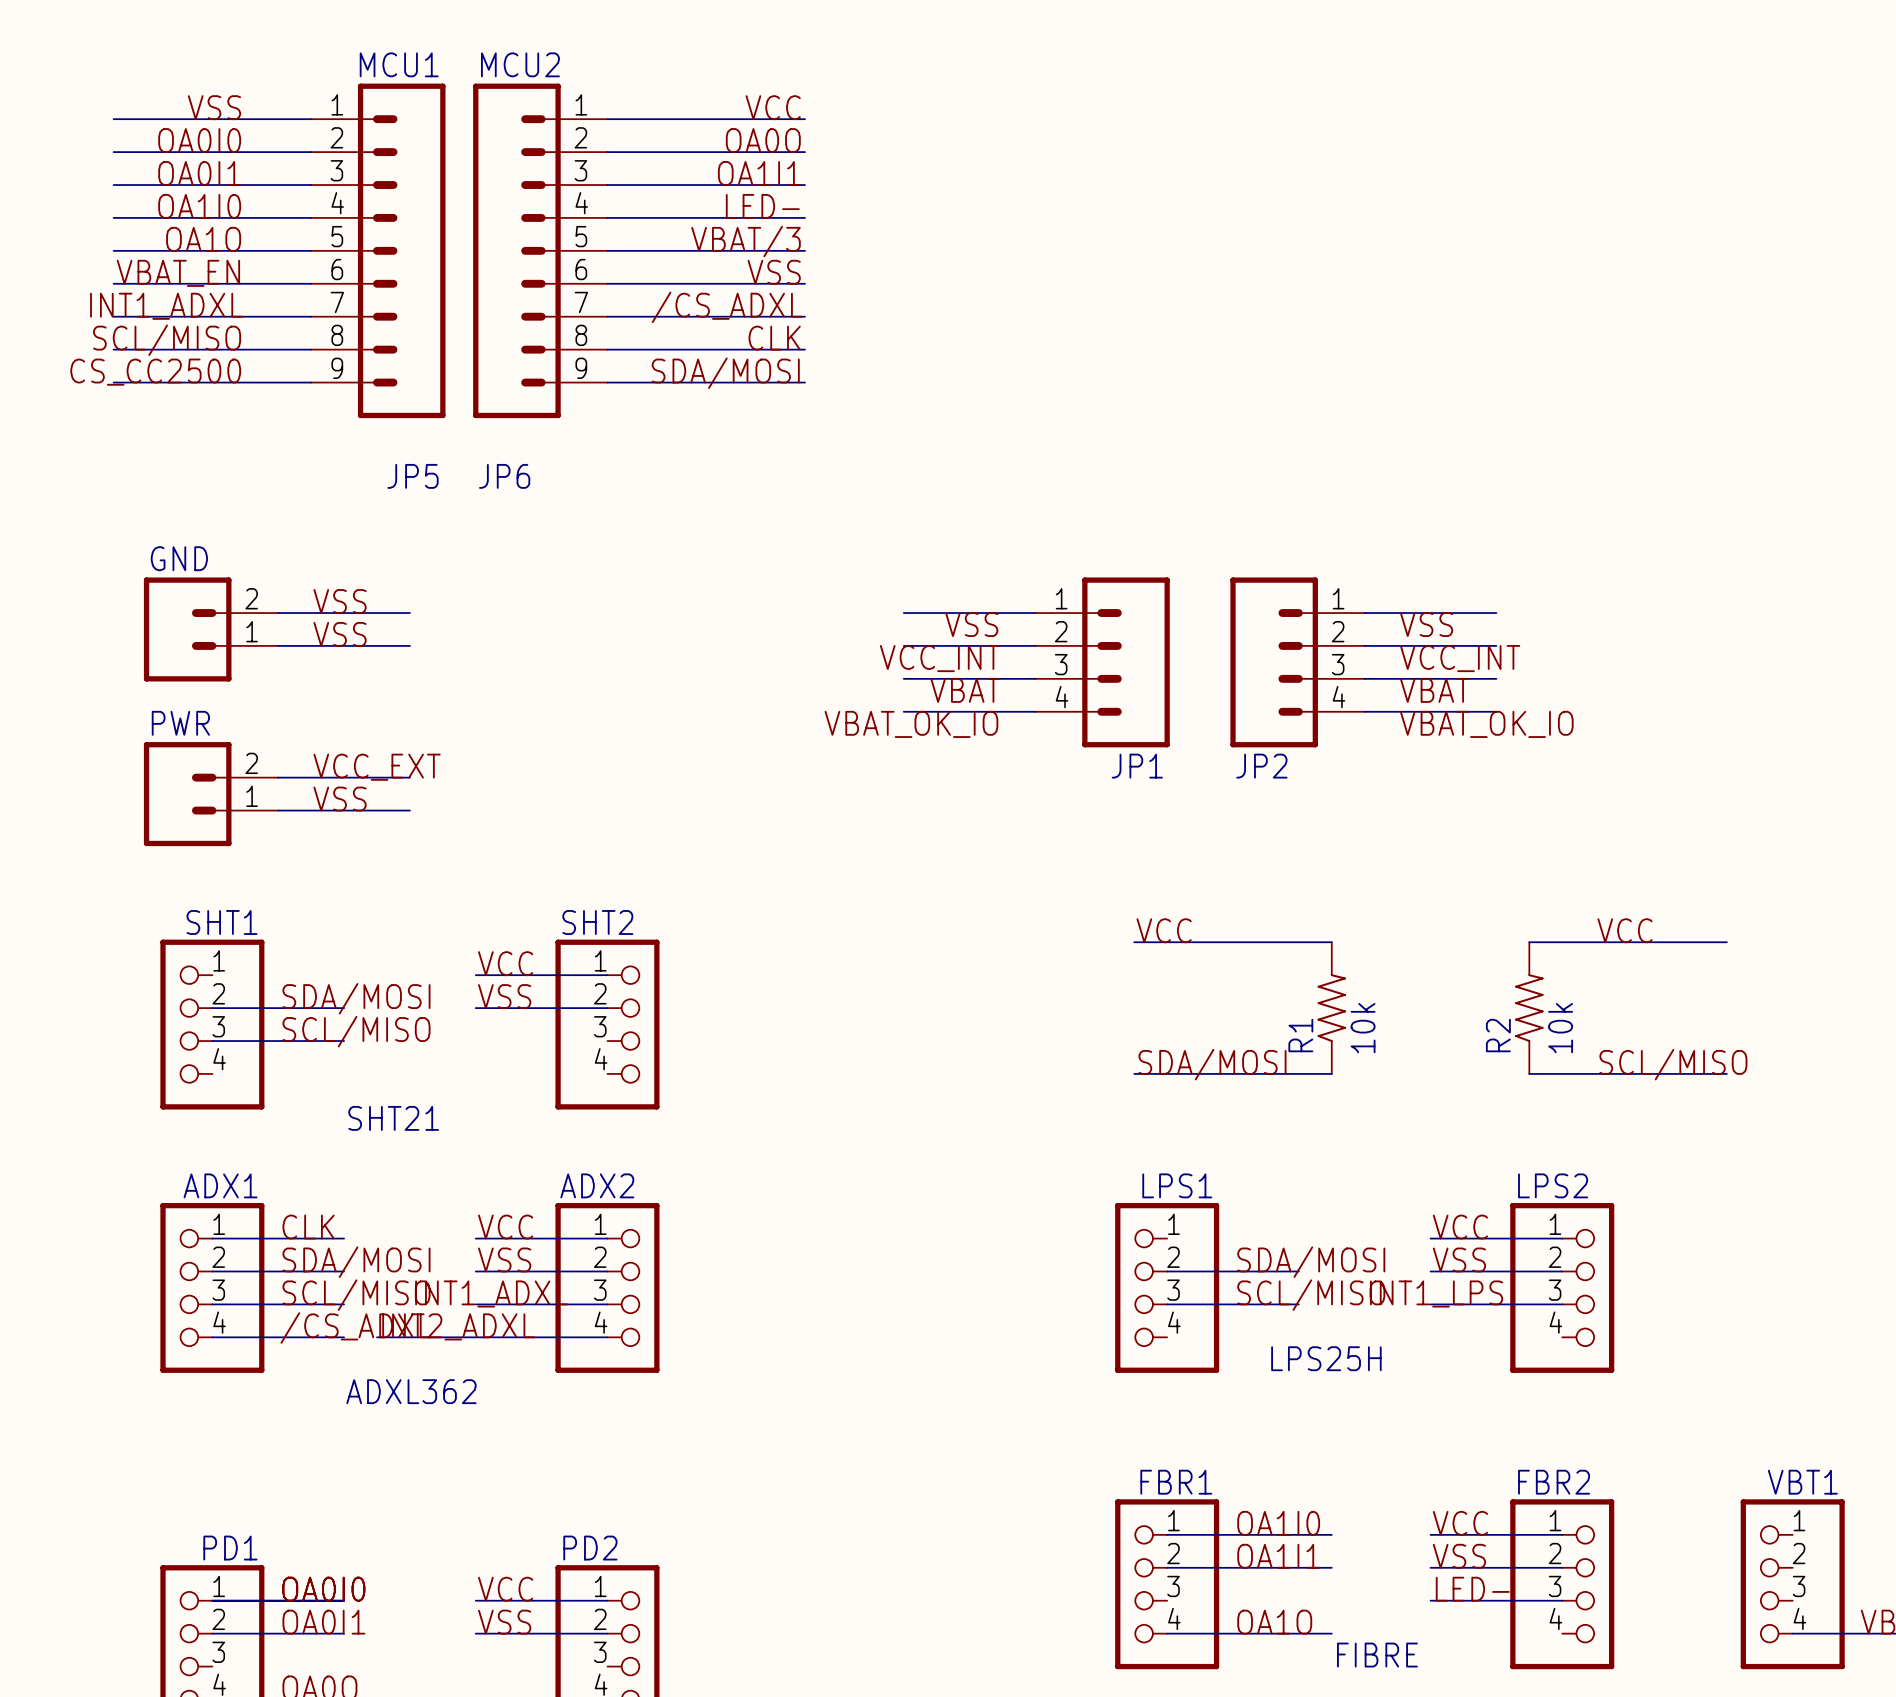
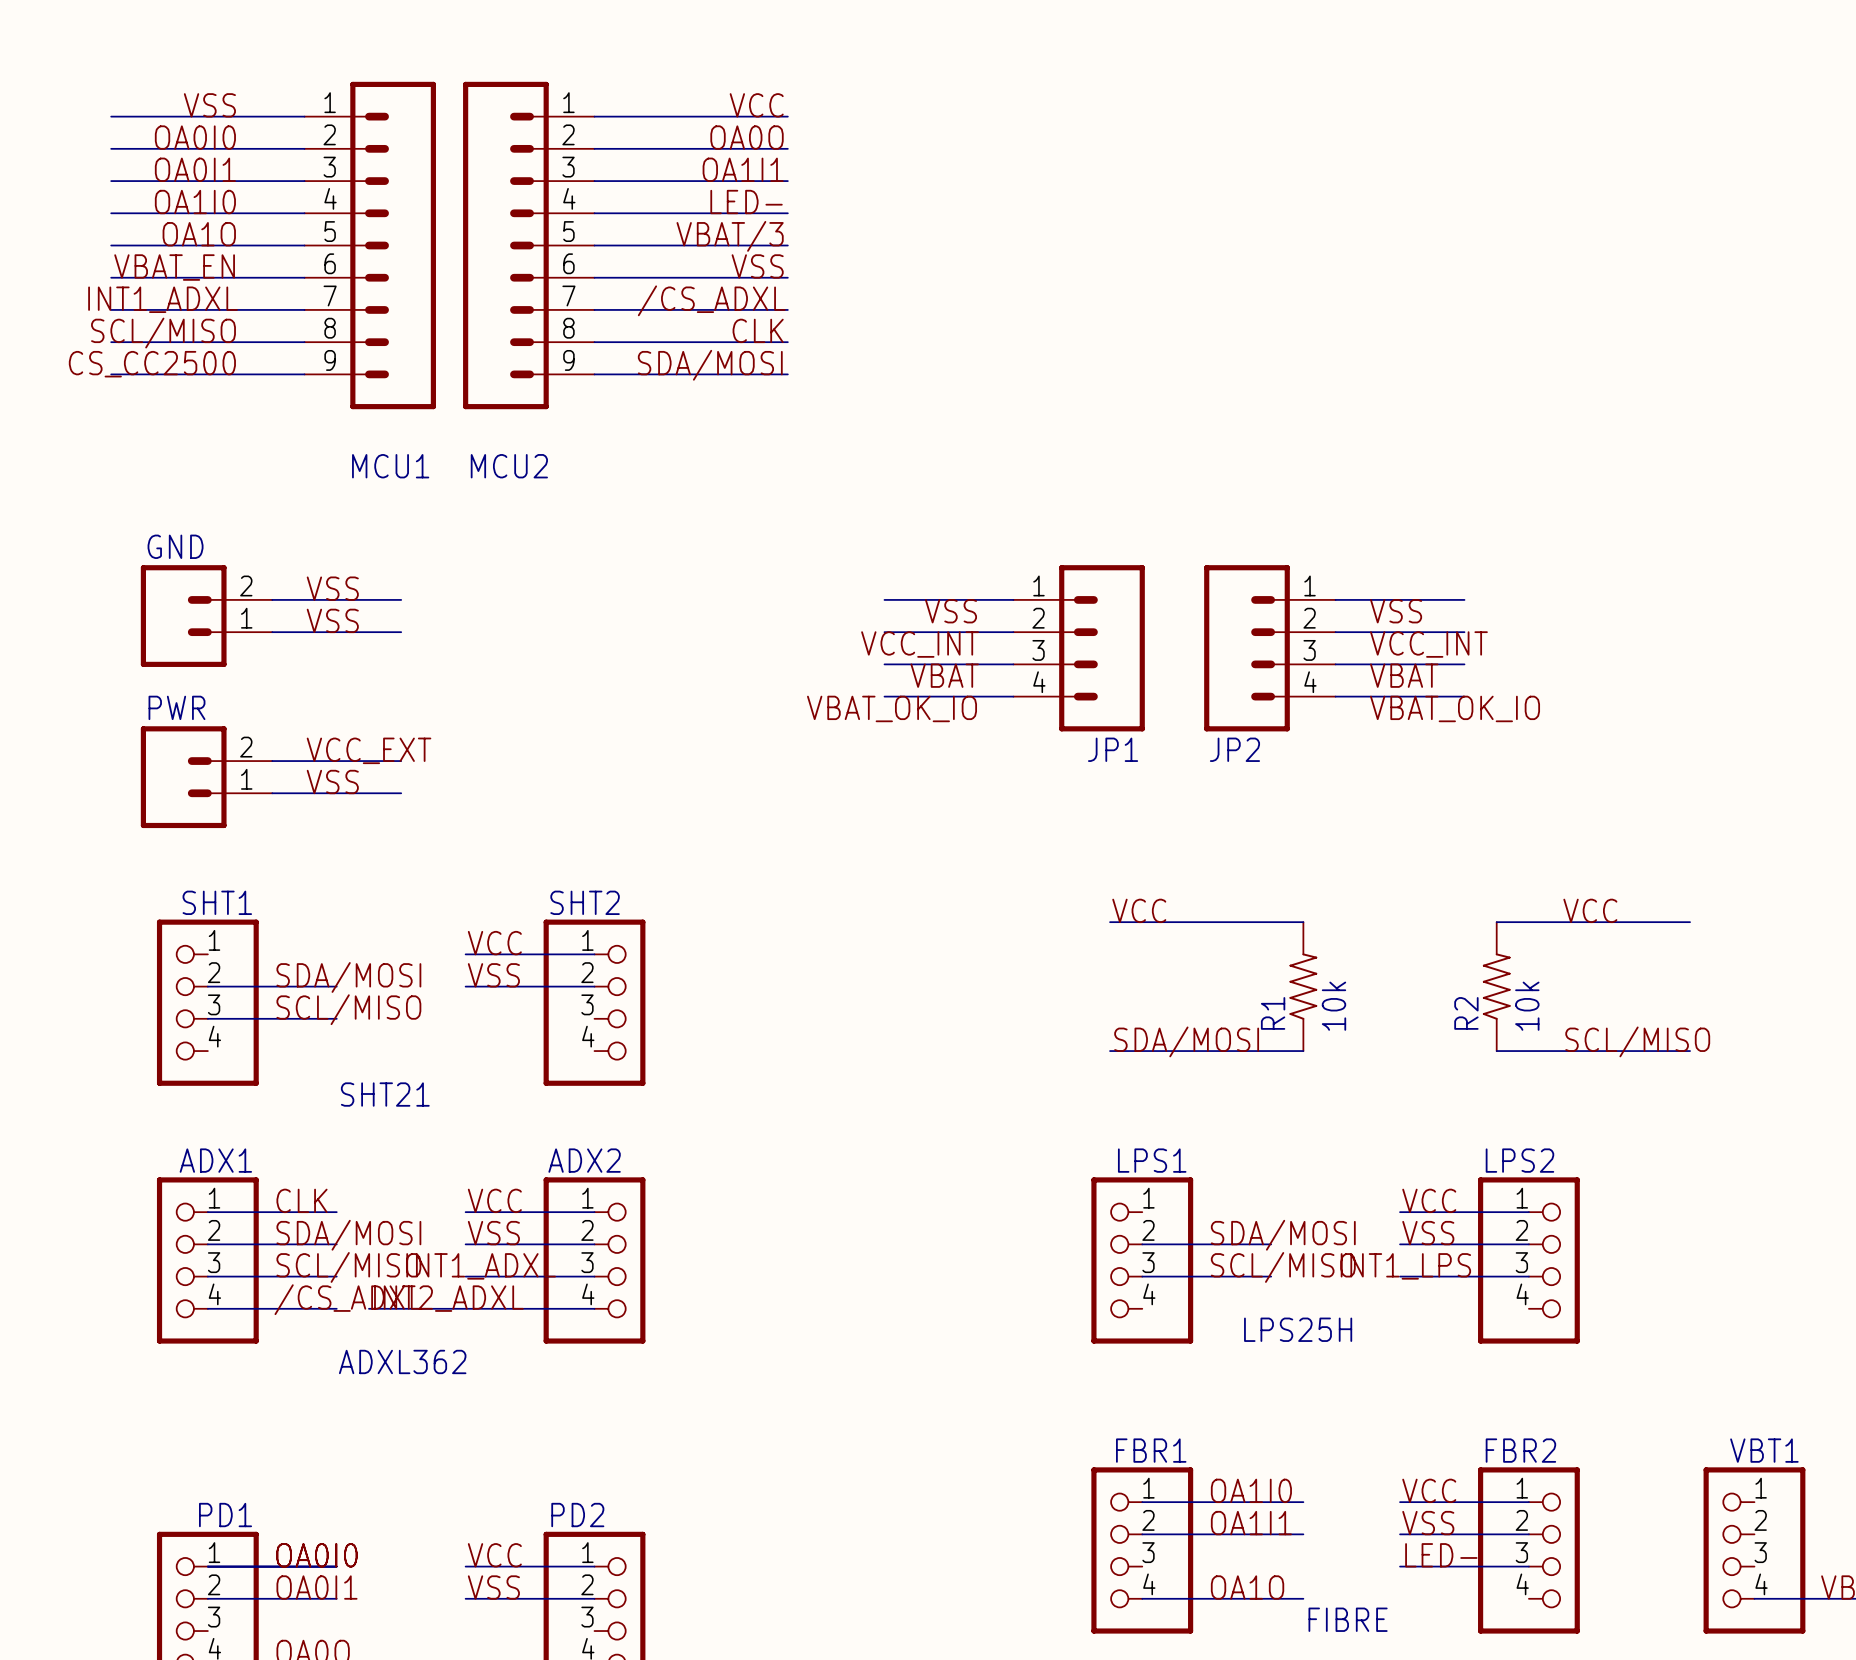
JP5 value: MCU1 (399, 64) -> none
JP6 value: MCU2 (520, 64) -> none
JP5 name: JP5 (412, 476) -> MCU1 (390, 466)
JP6 name: JP6 (504, 476) -> MCU2 (509, 466)

